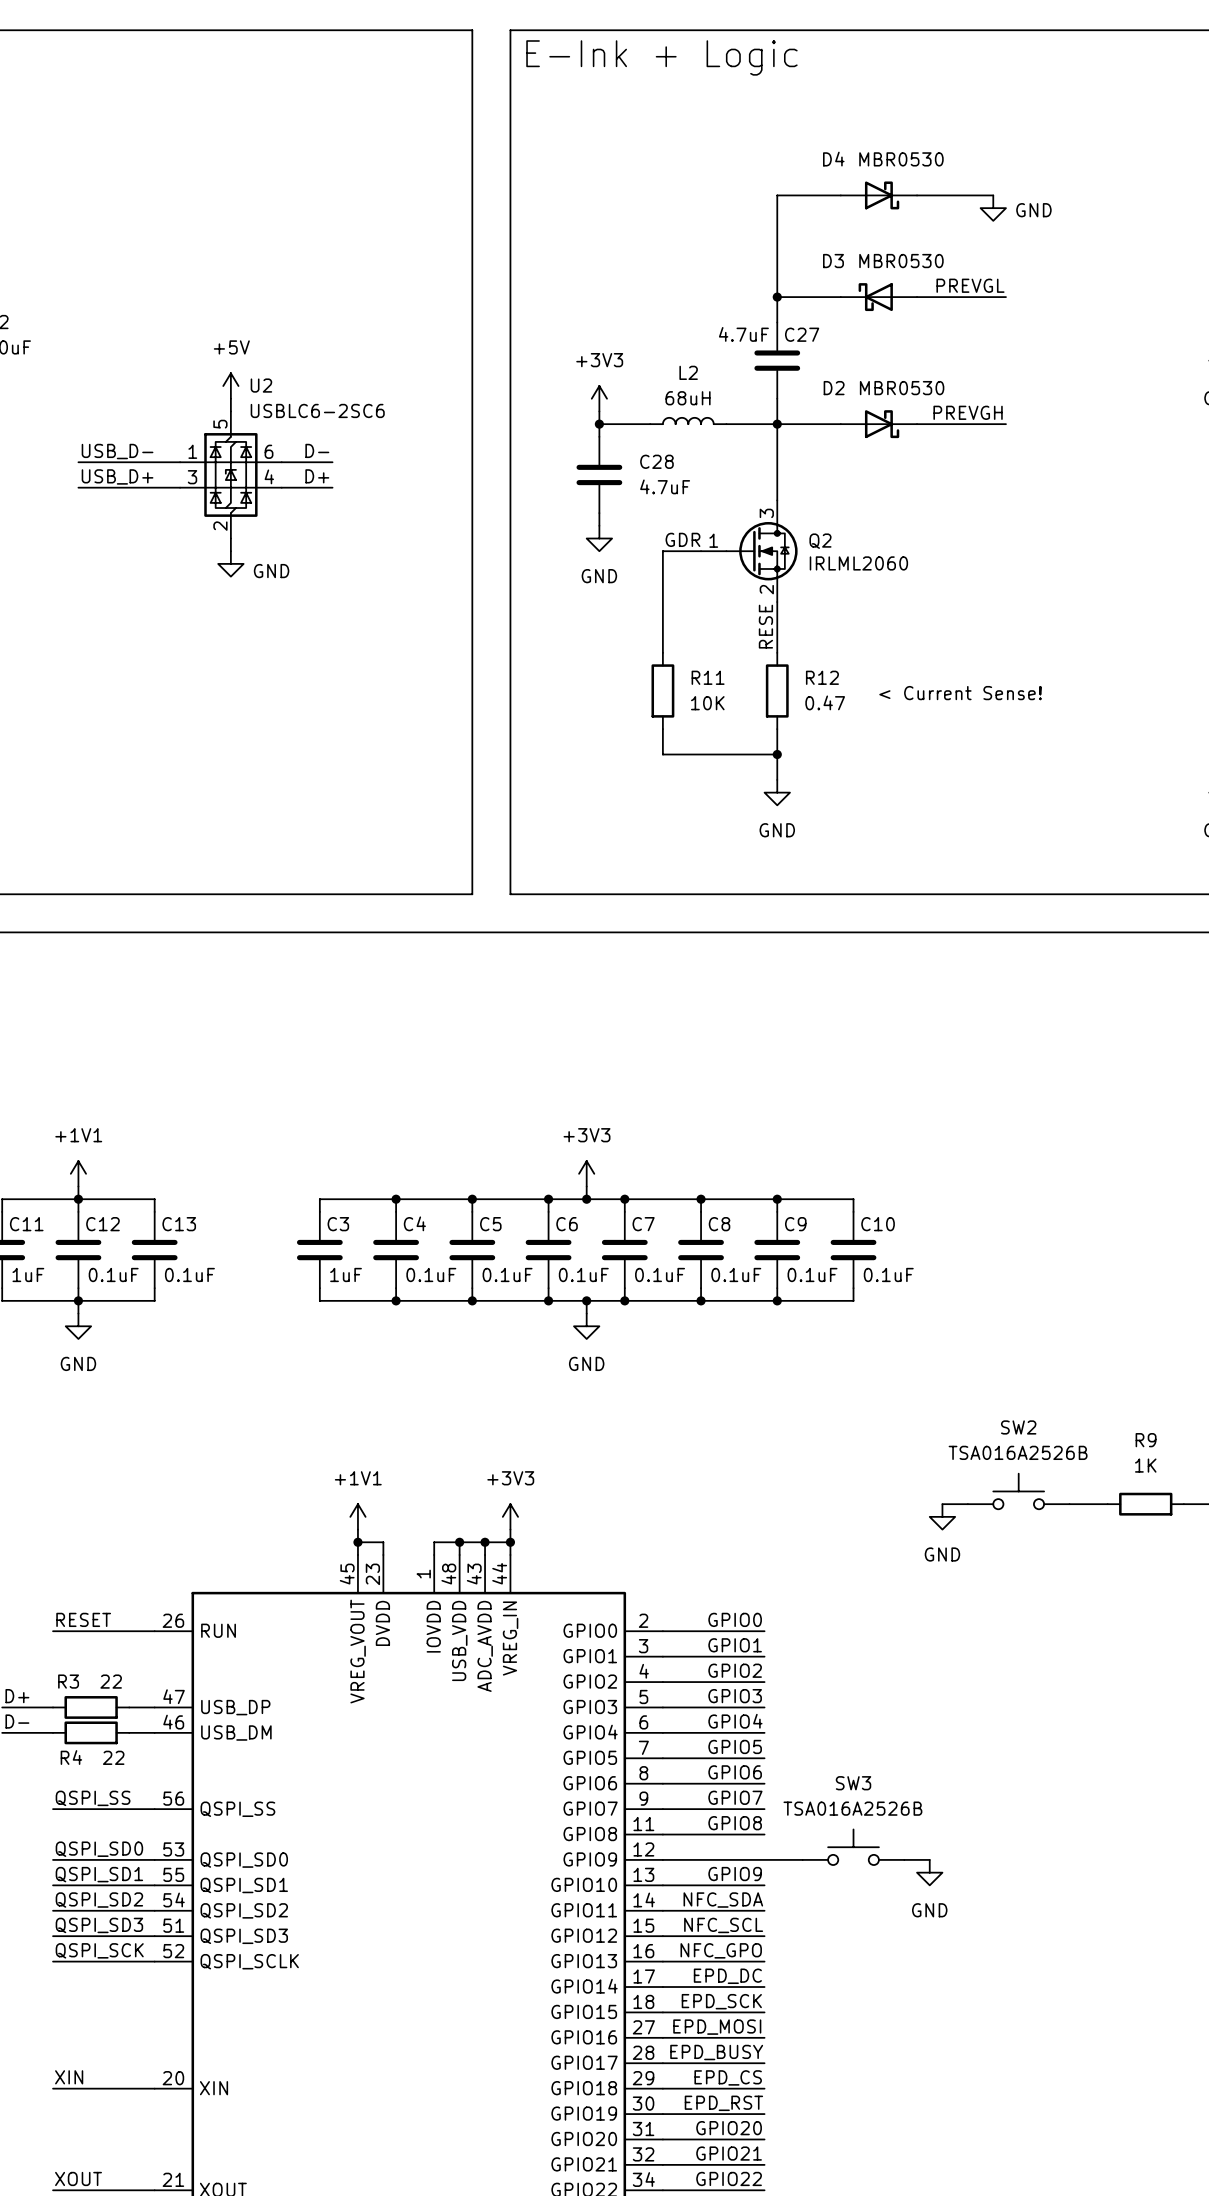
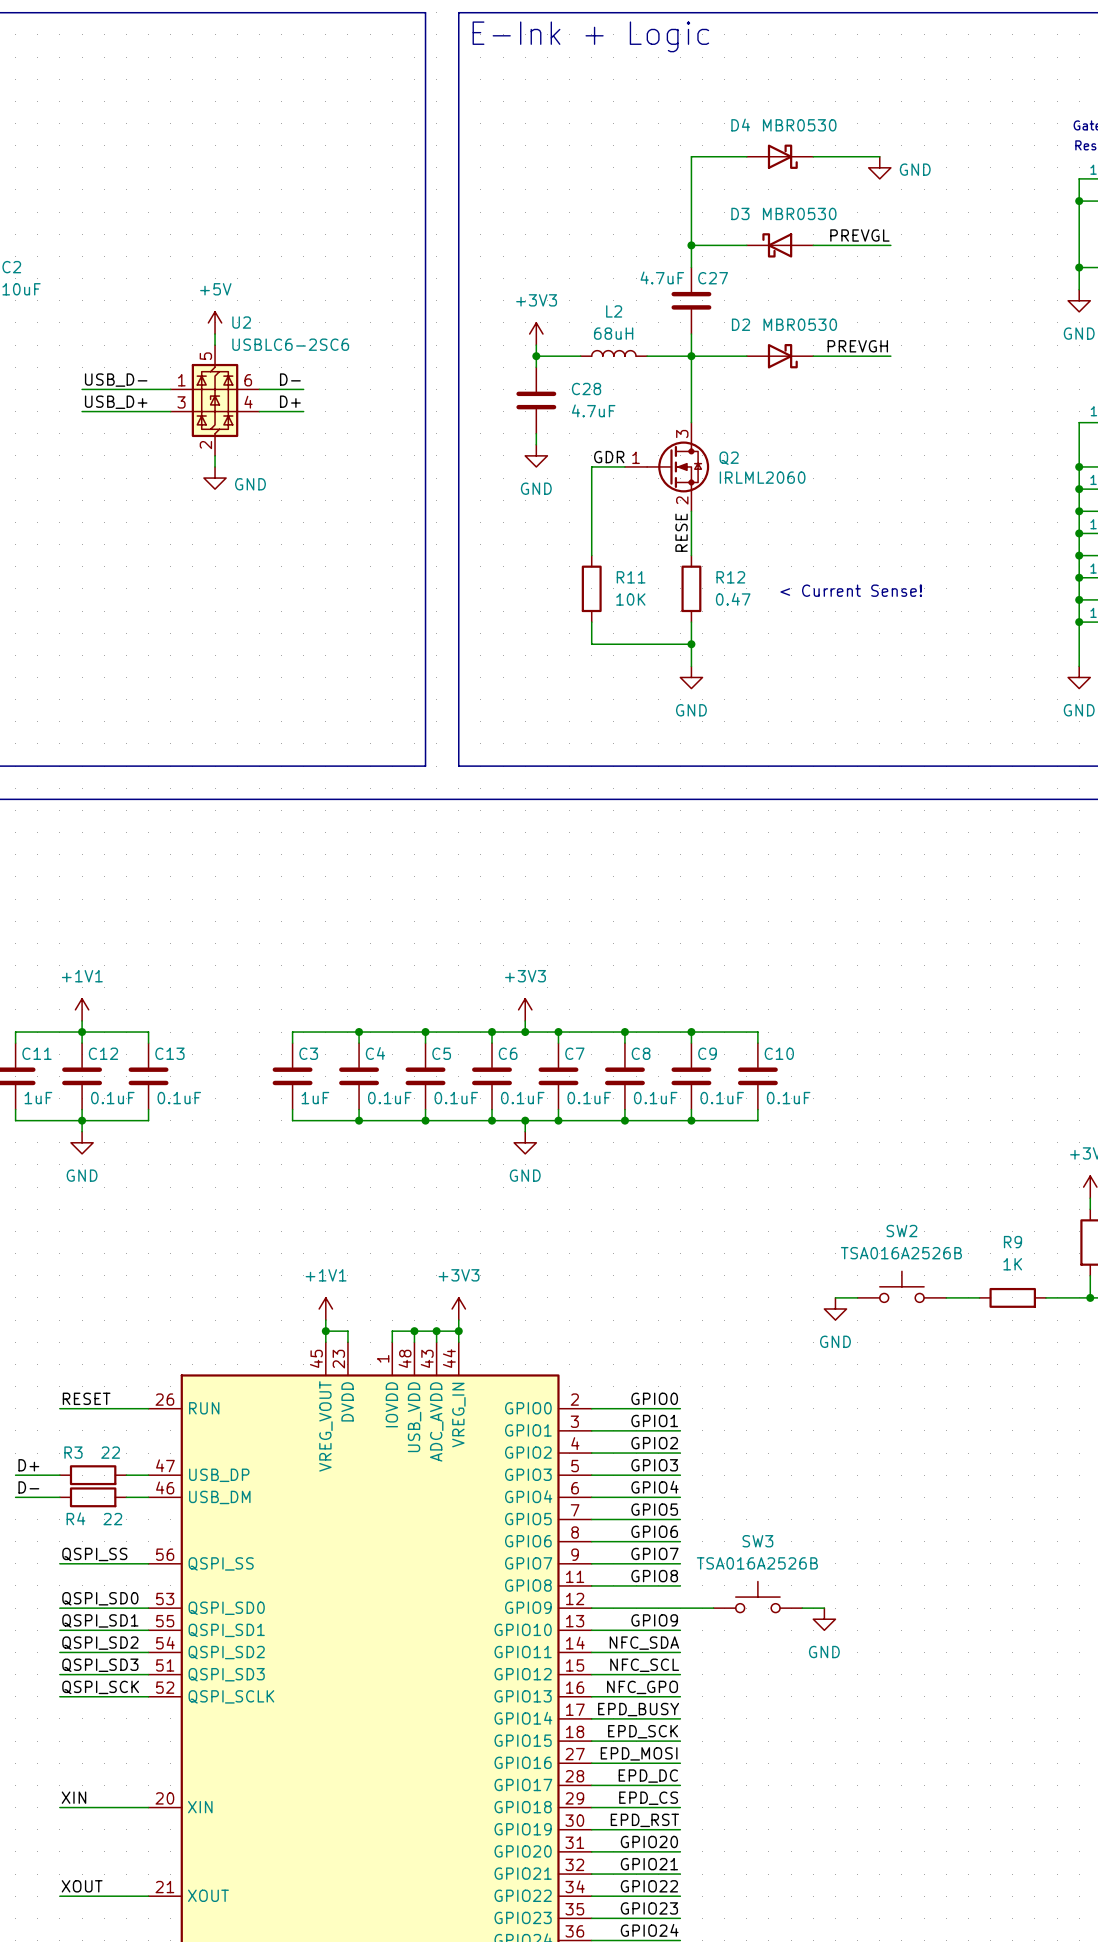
label: EPD_DC (727, 1976) -> EPD_BUSY (638, 1709)
label: EPD_BUSY (716, 2052) -> EPD_DC (648, 1776)

